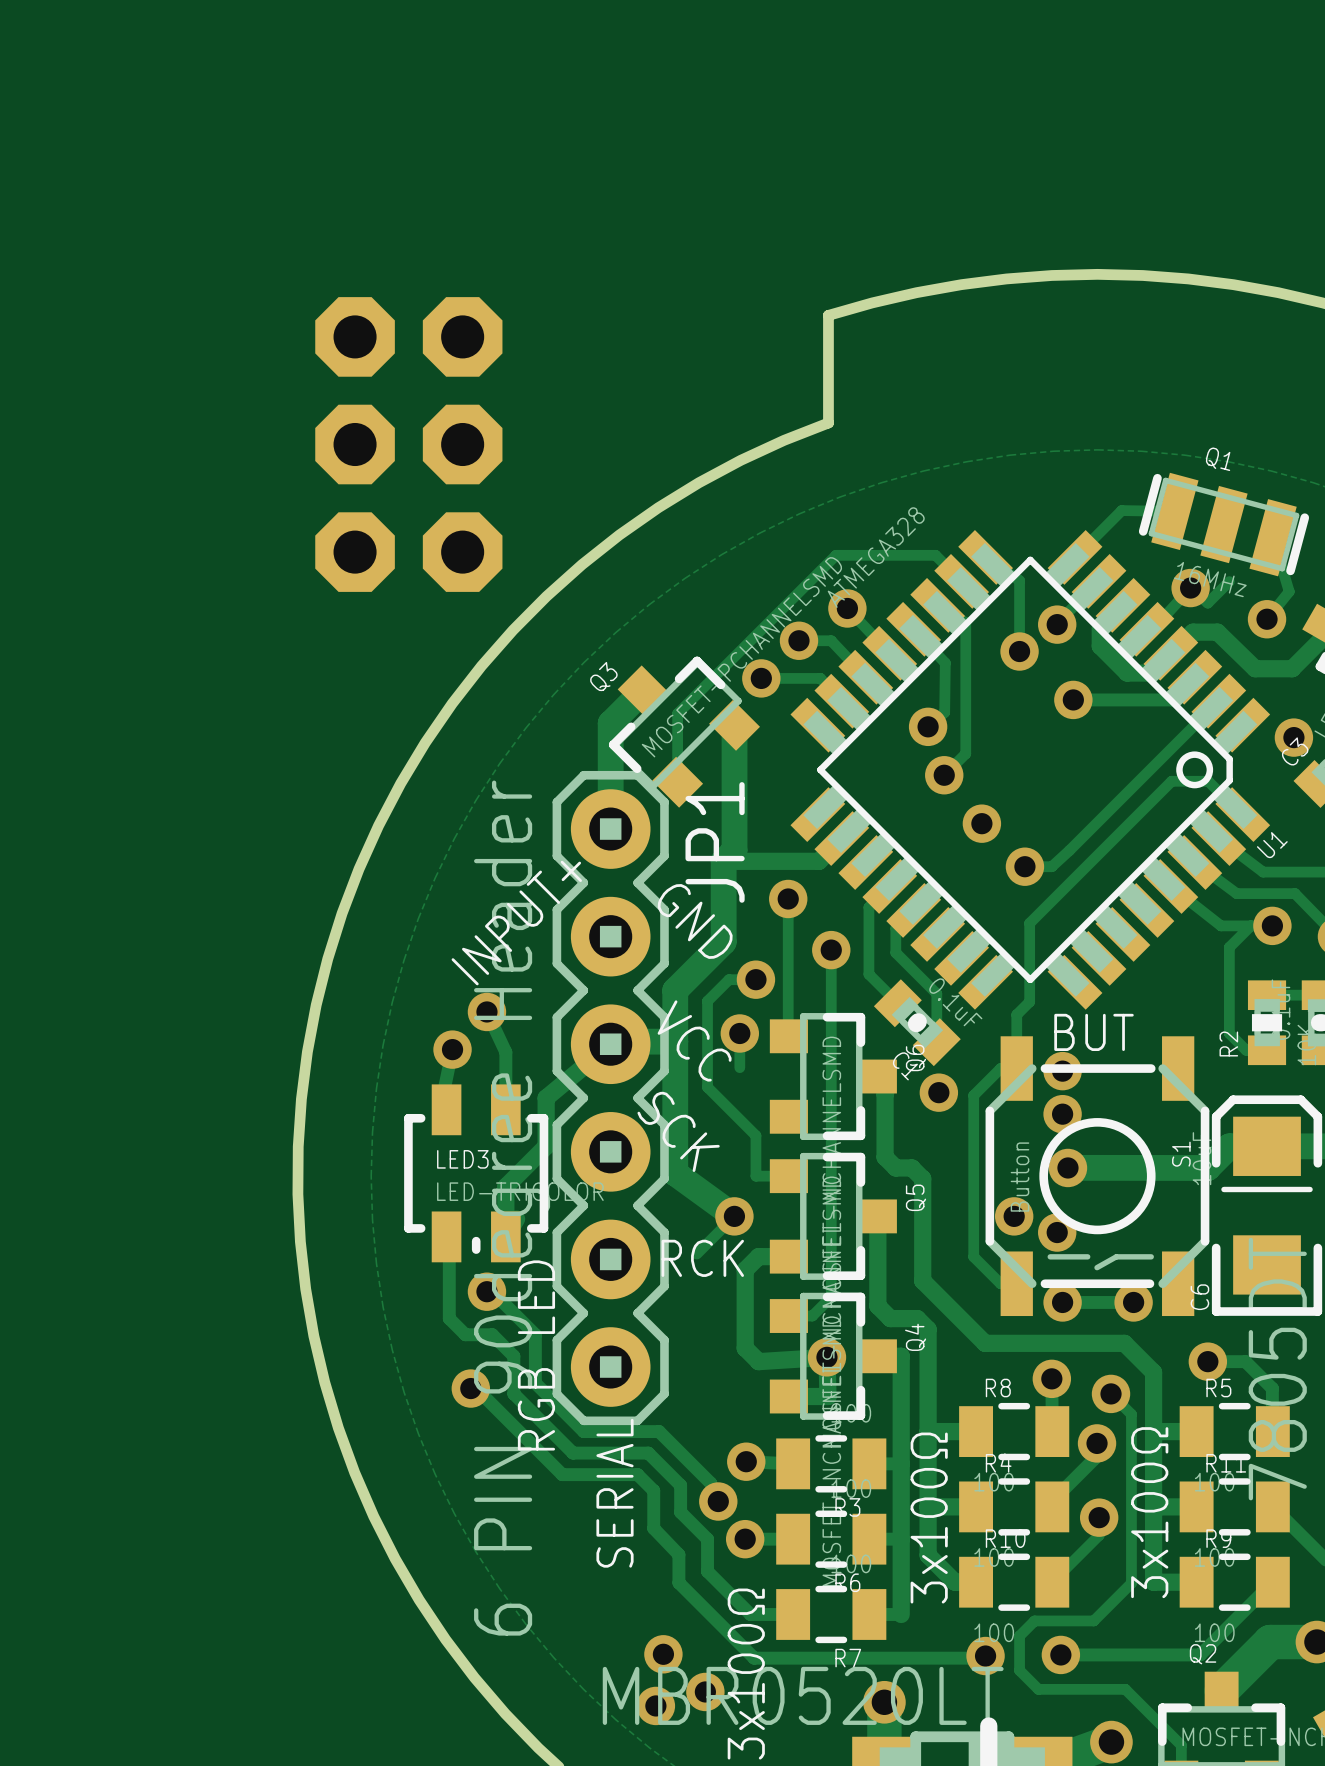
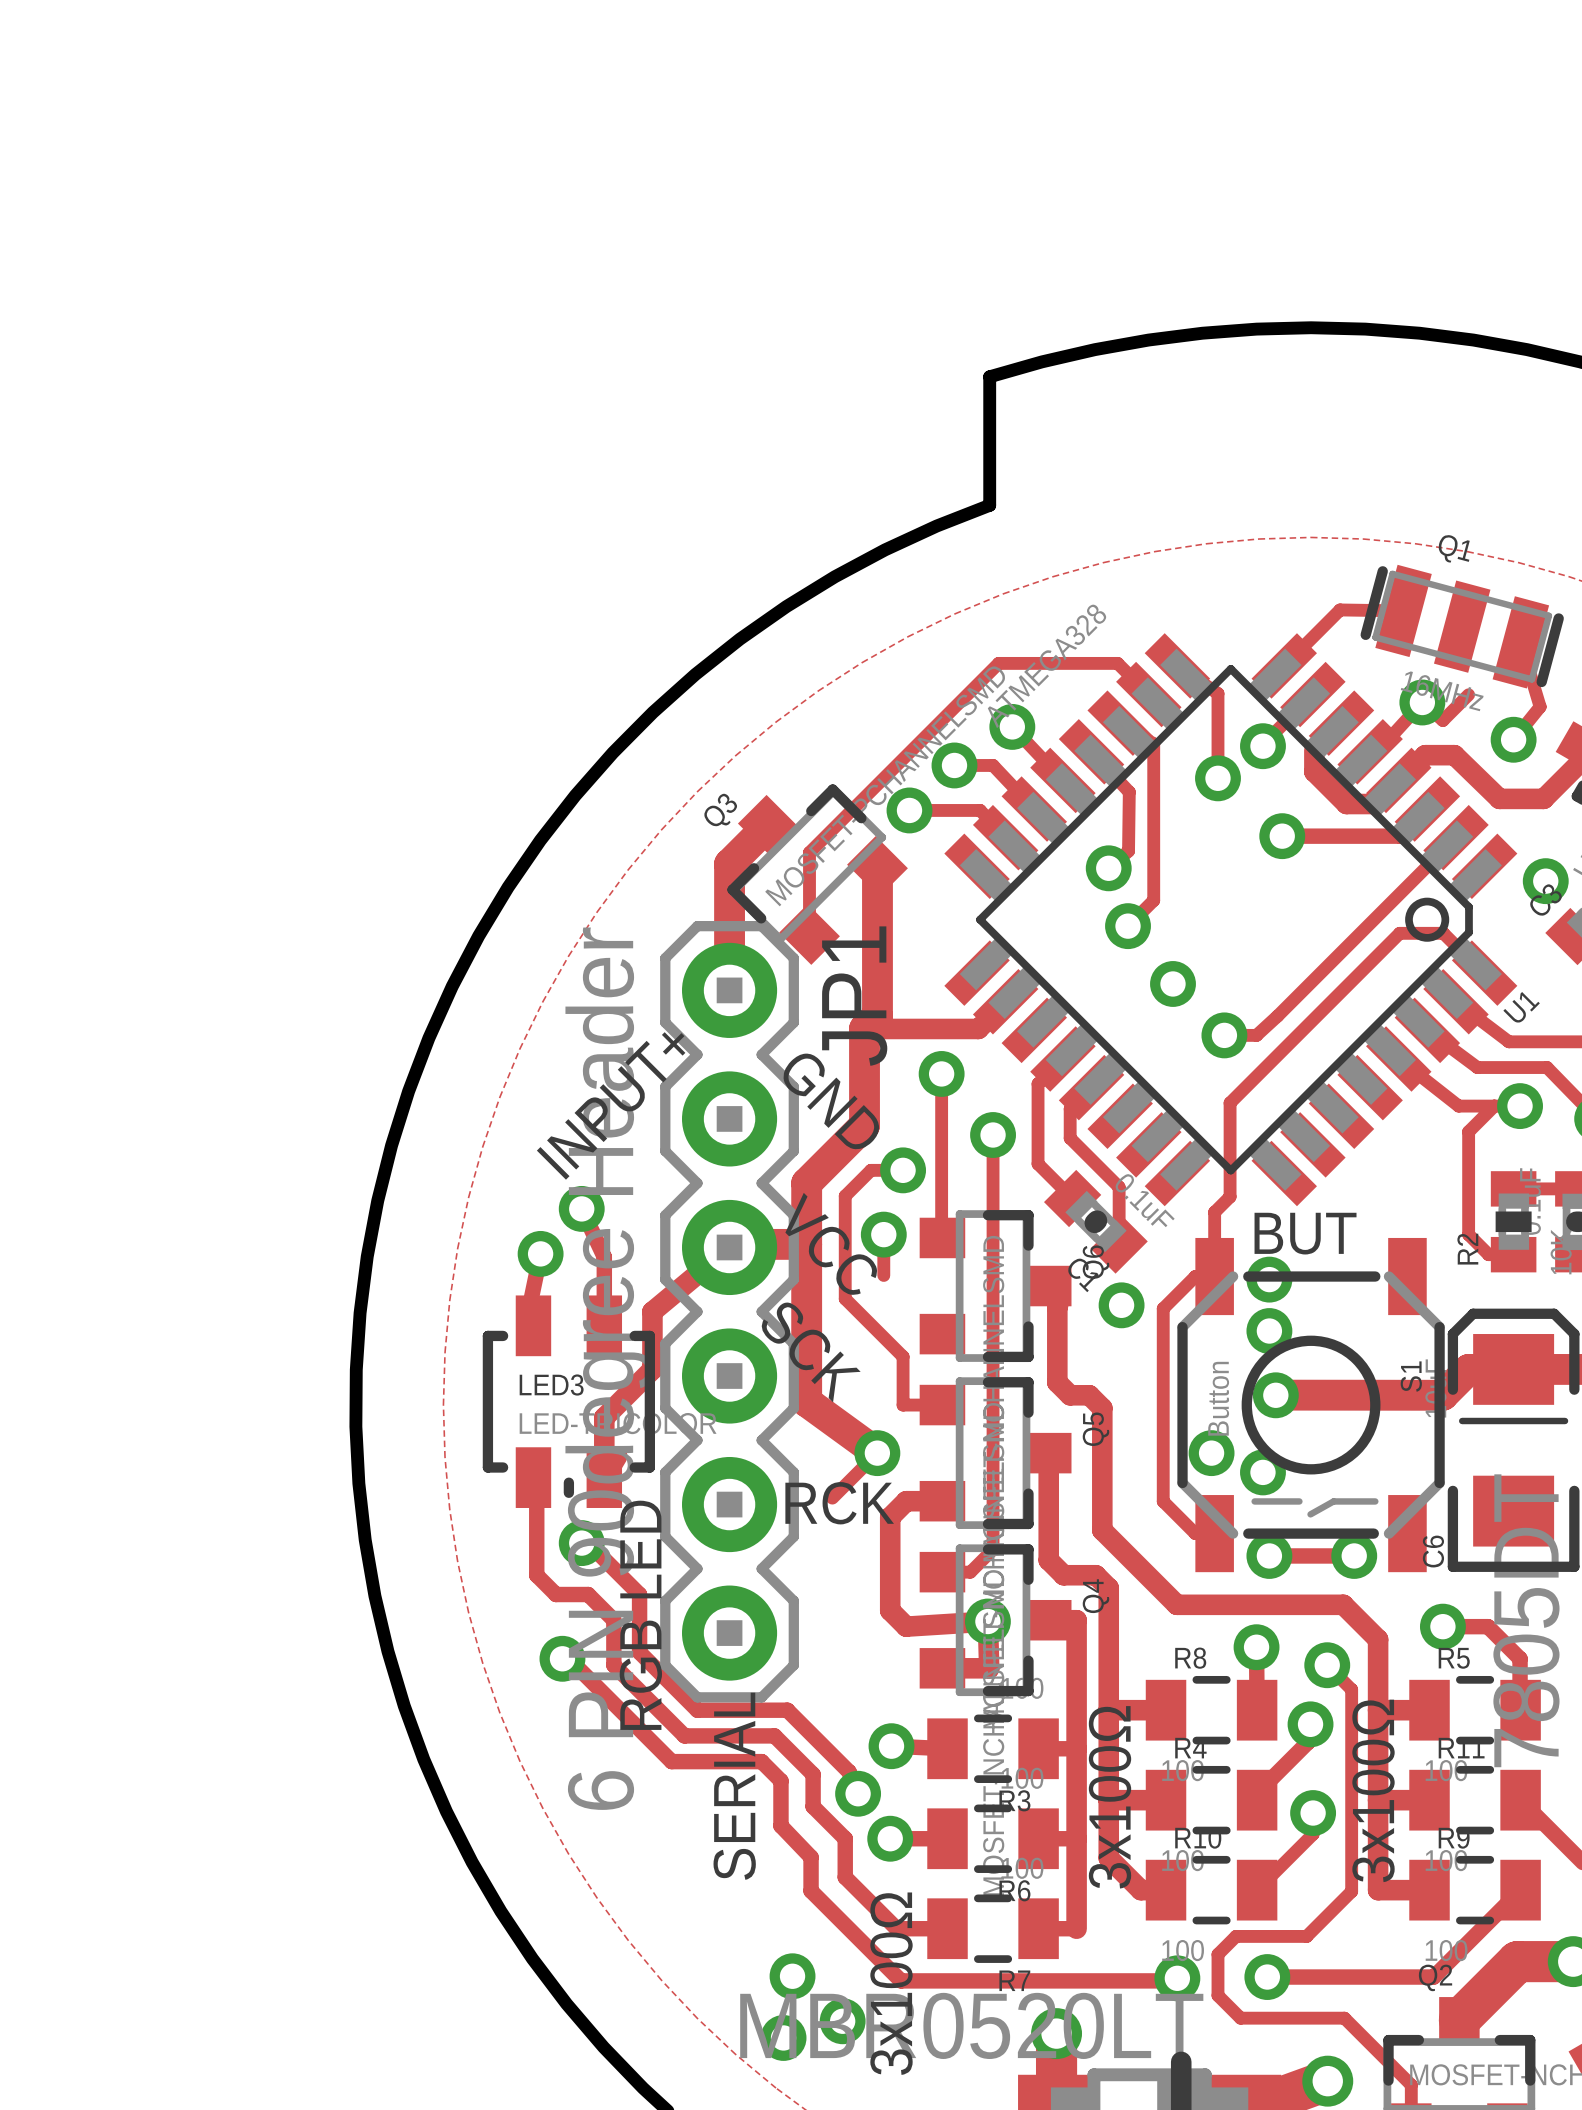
part: (408, 444) -> none

